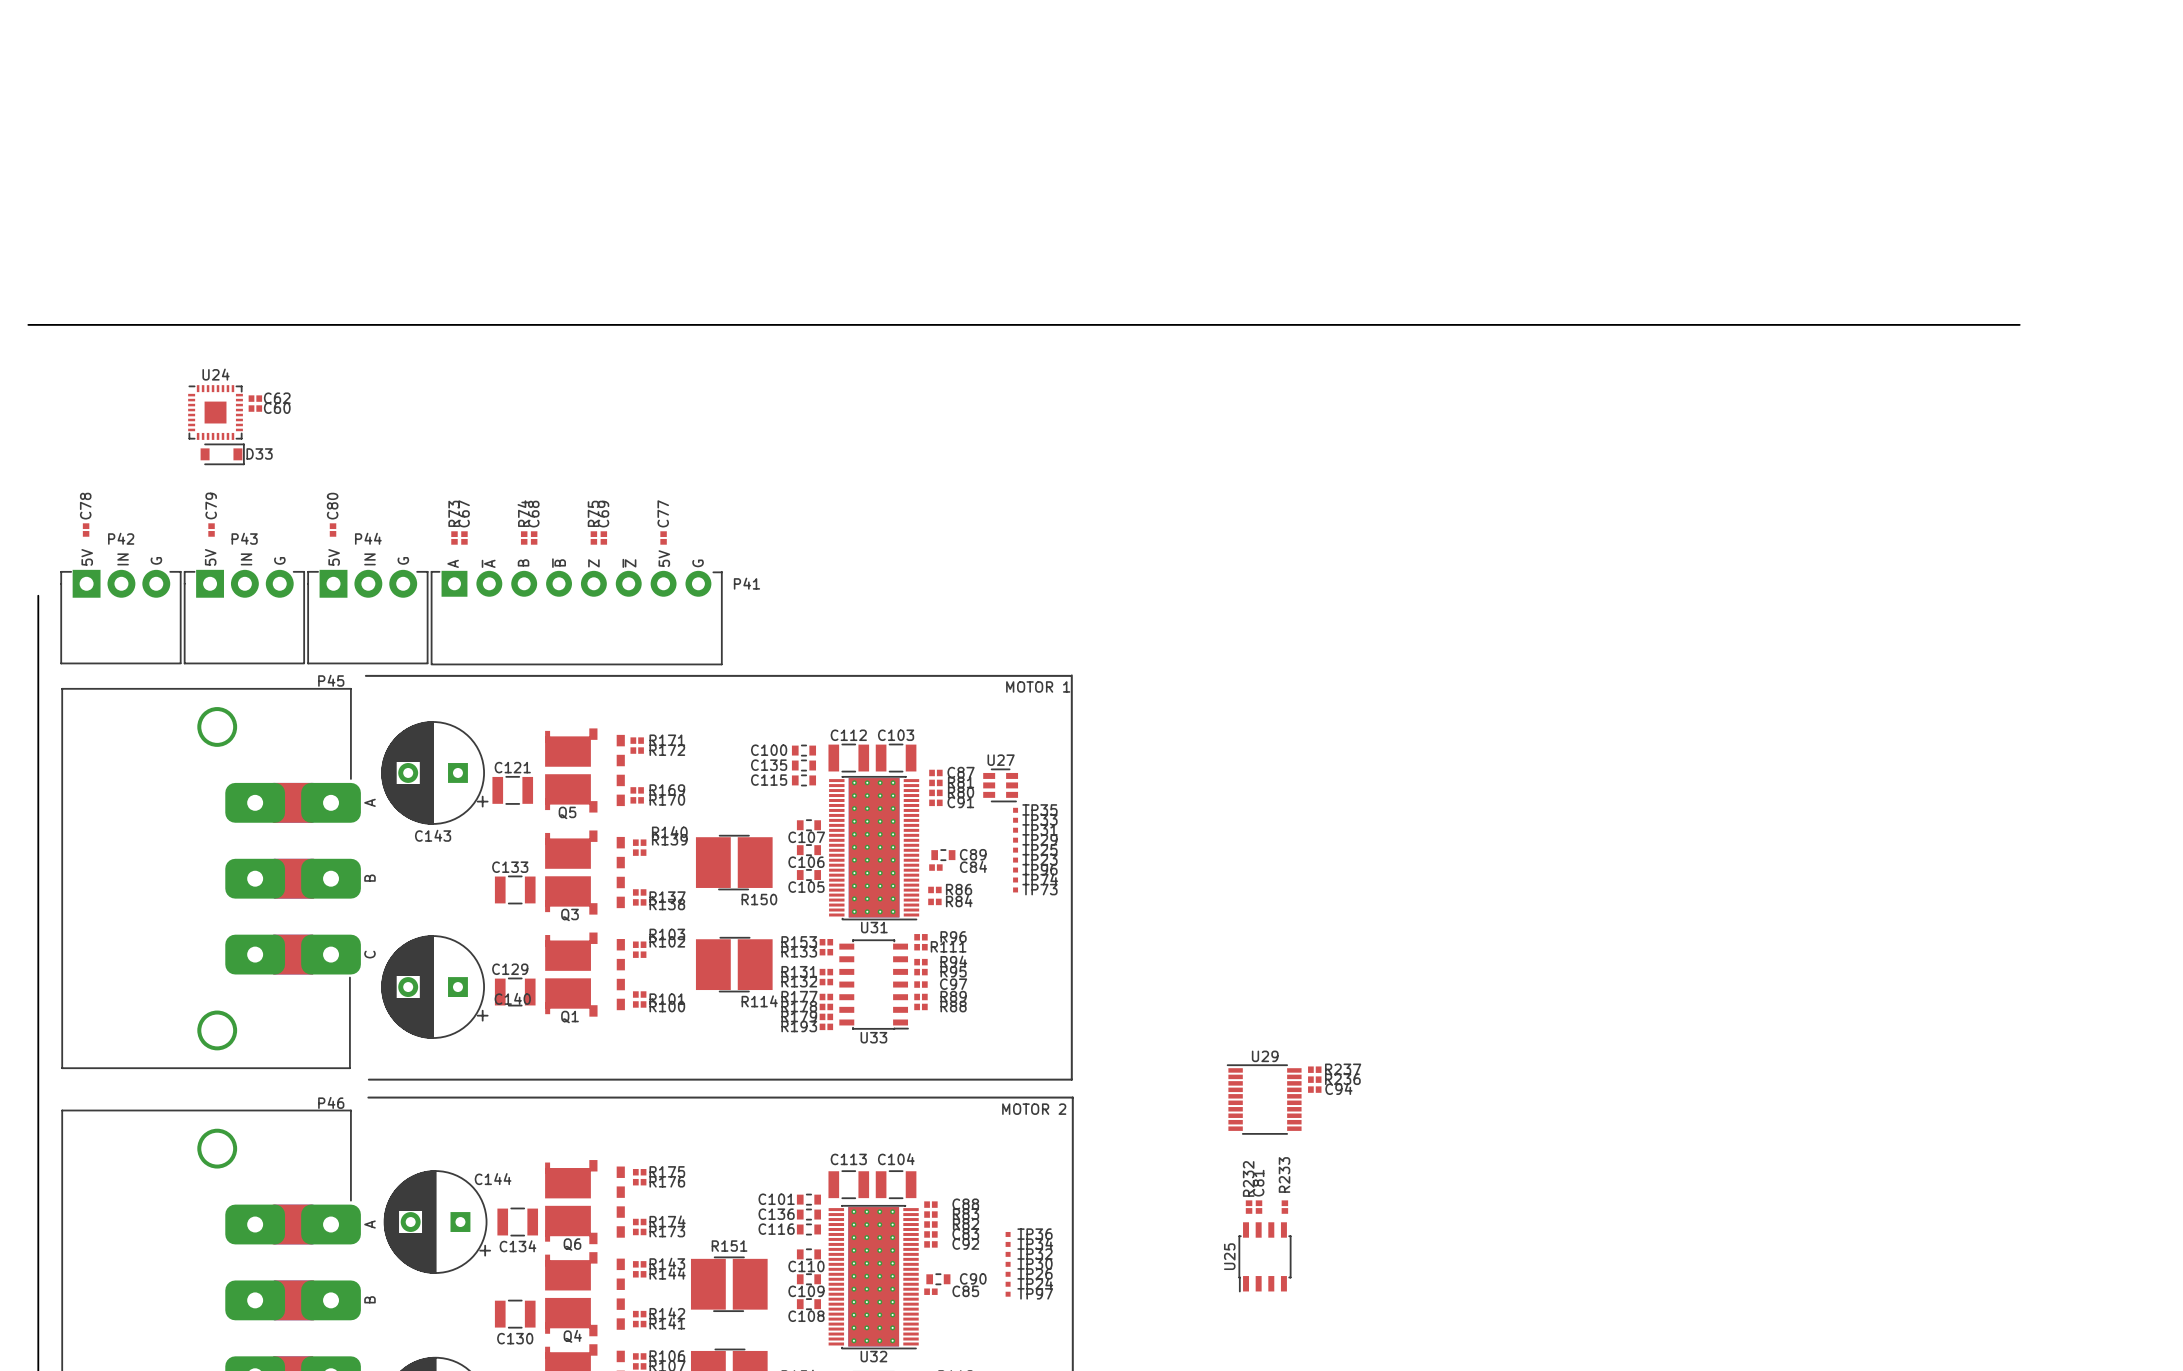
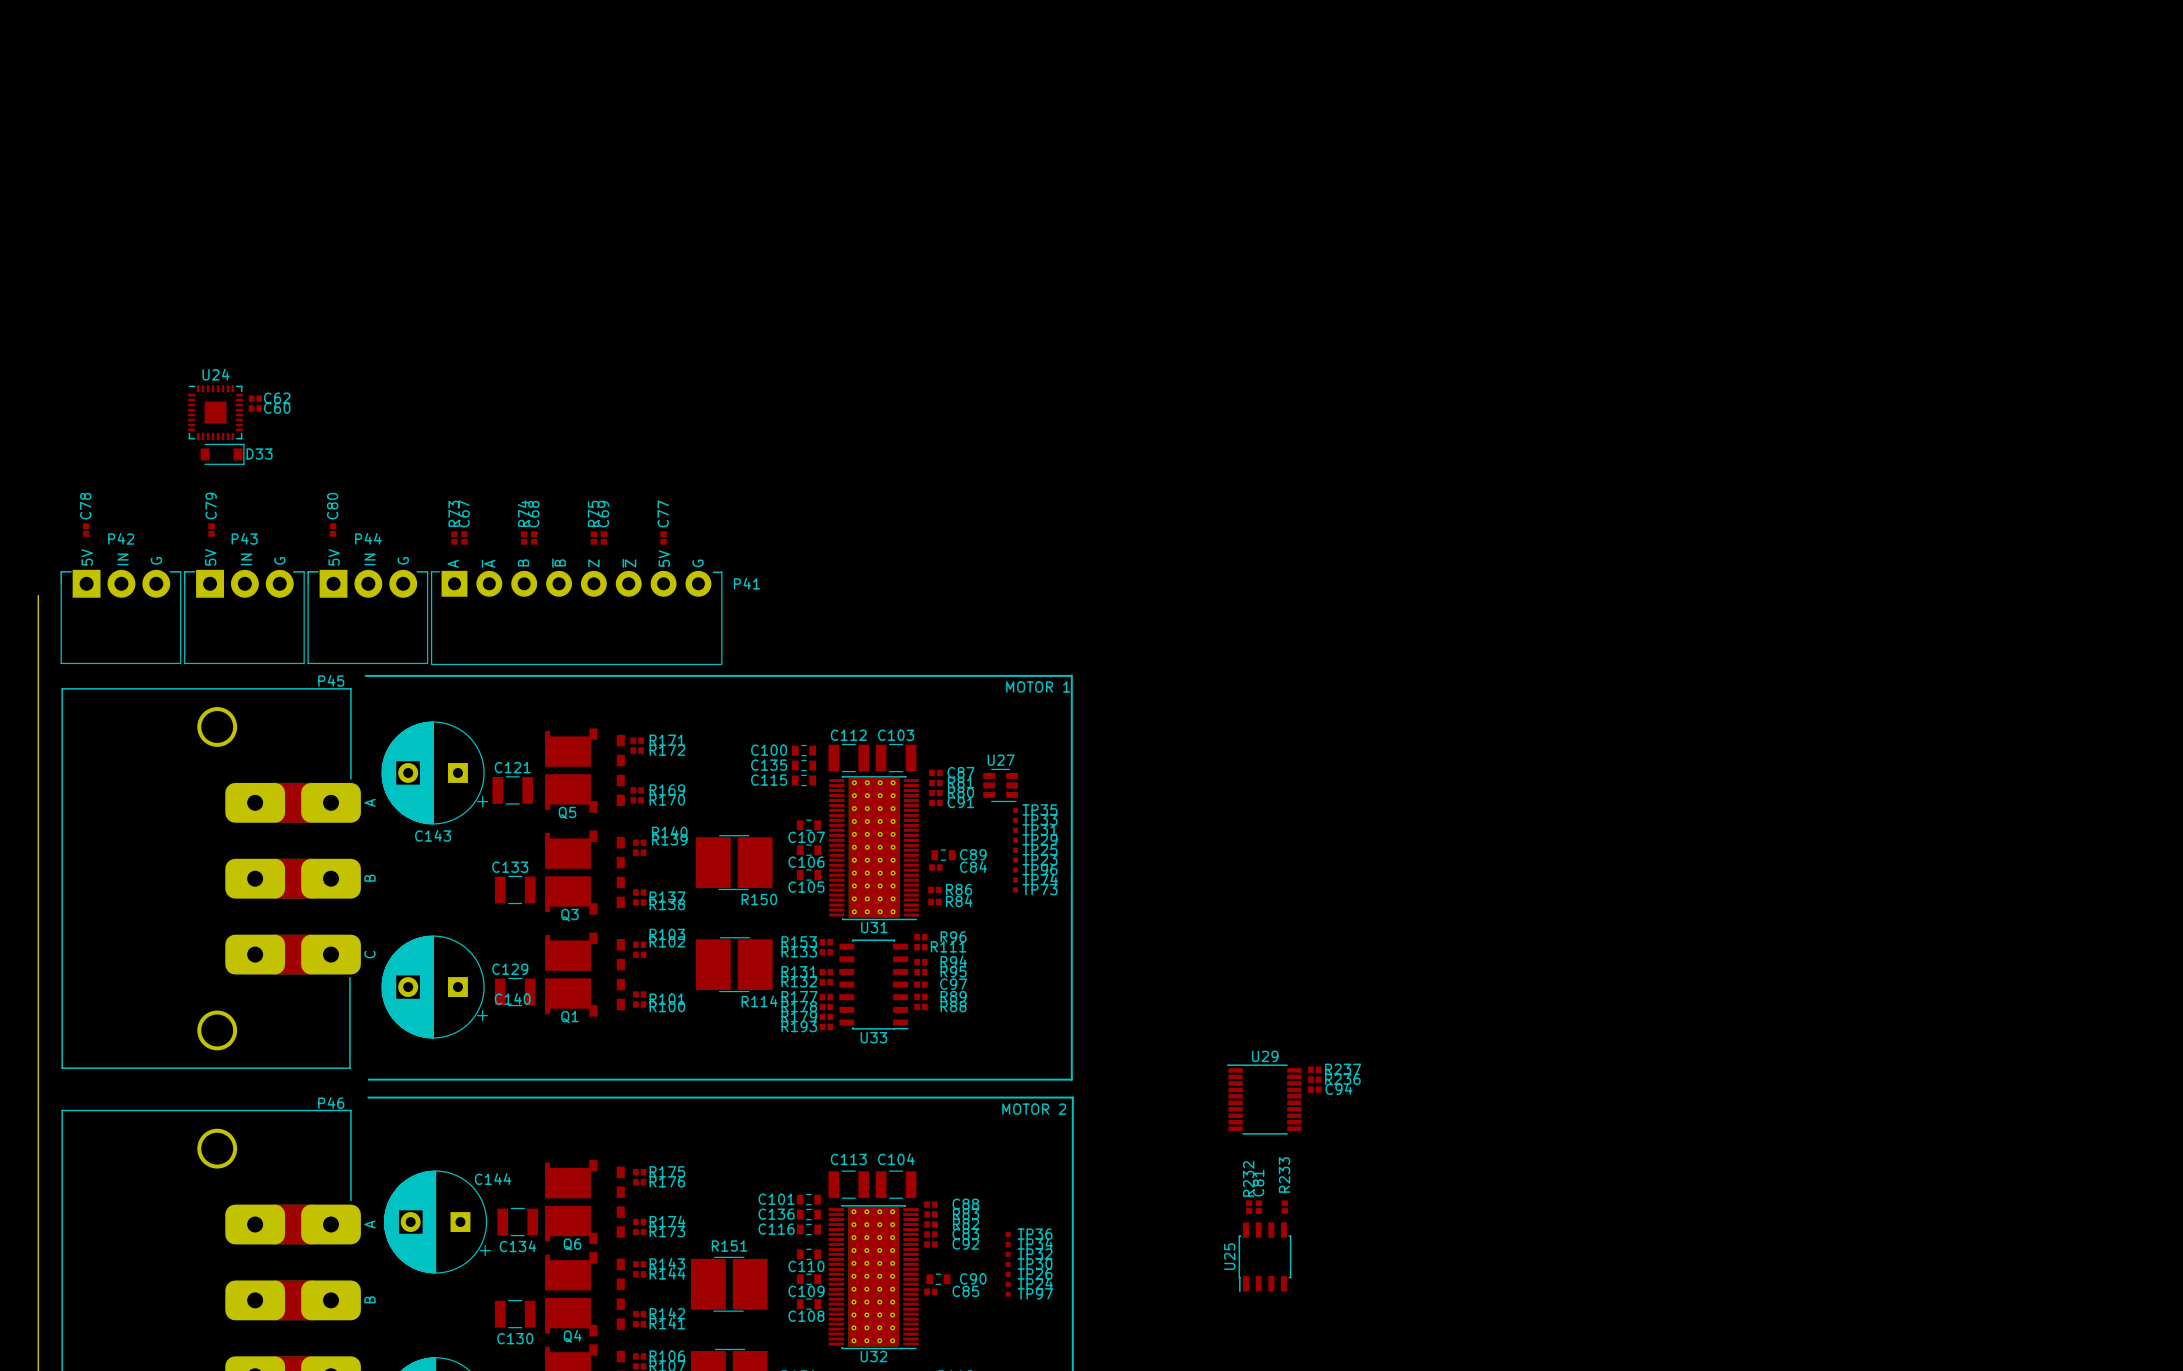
board edge: (28, 324) (2019, 324) -> none

